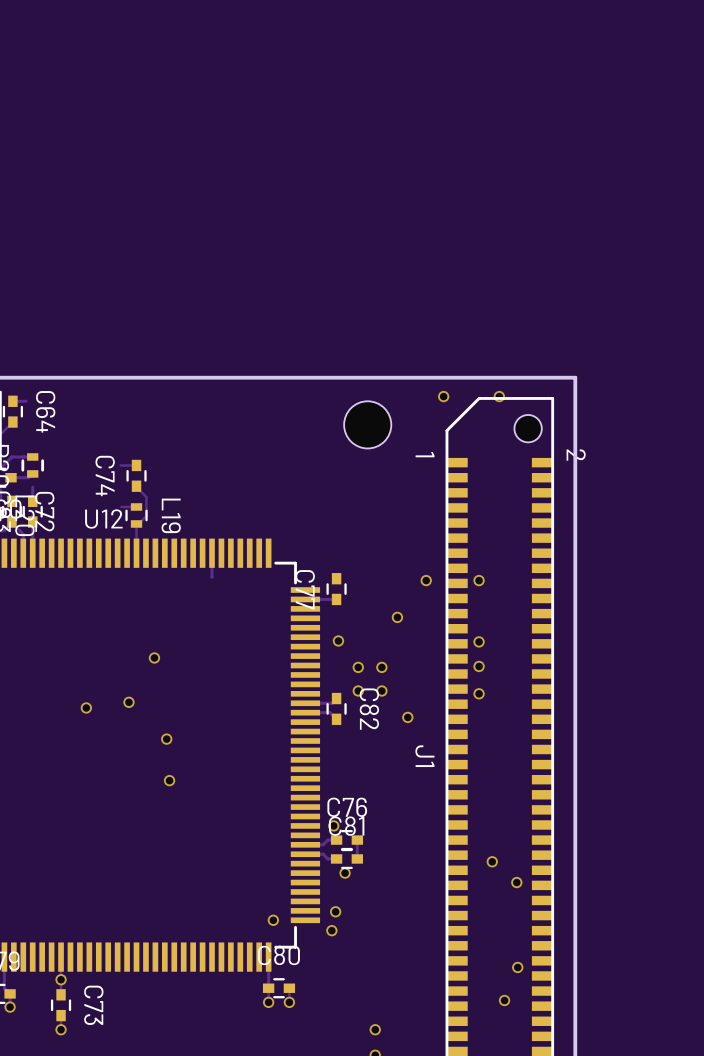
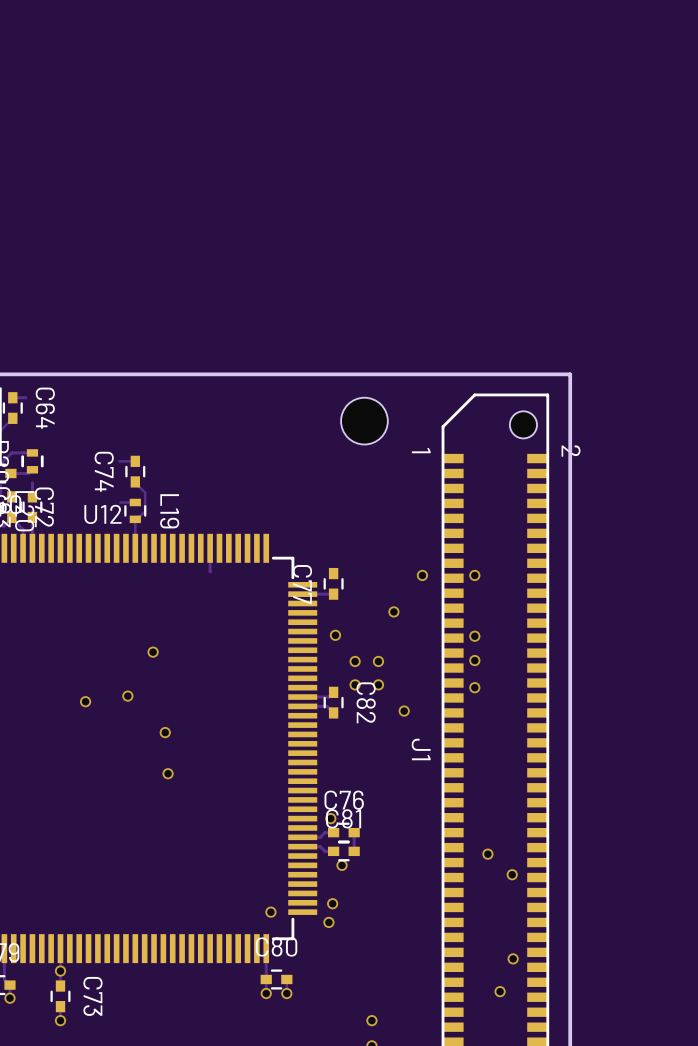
via: (443, 396) -> none
via: (499, 396) -> none

